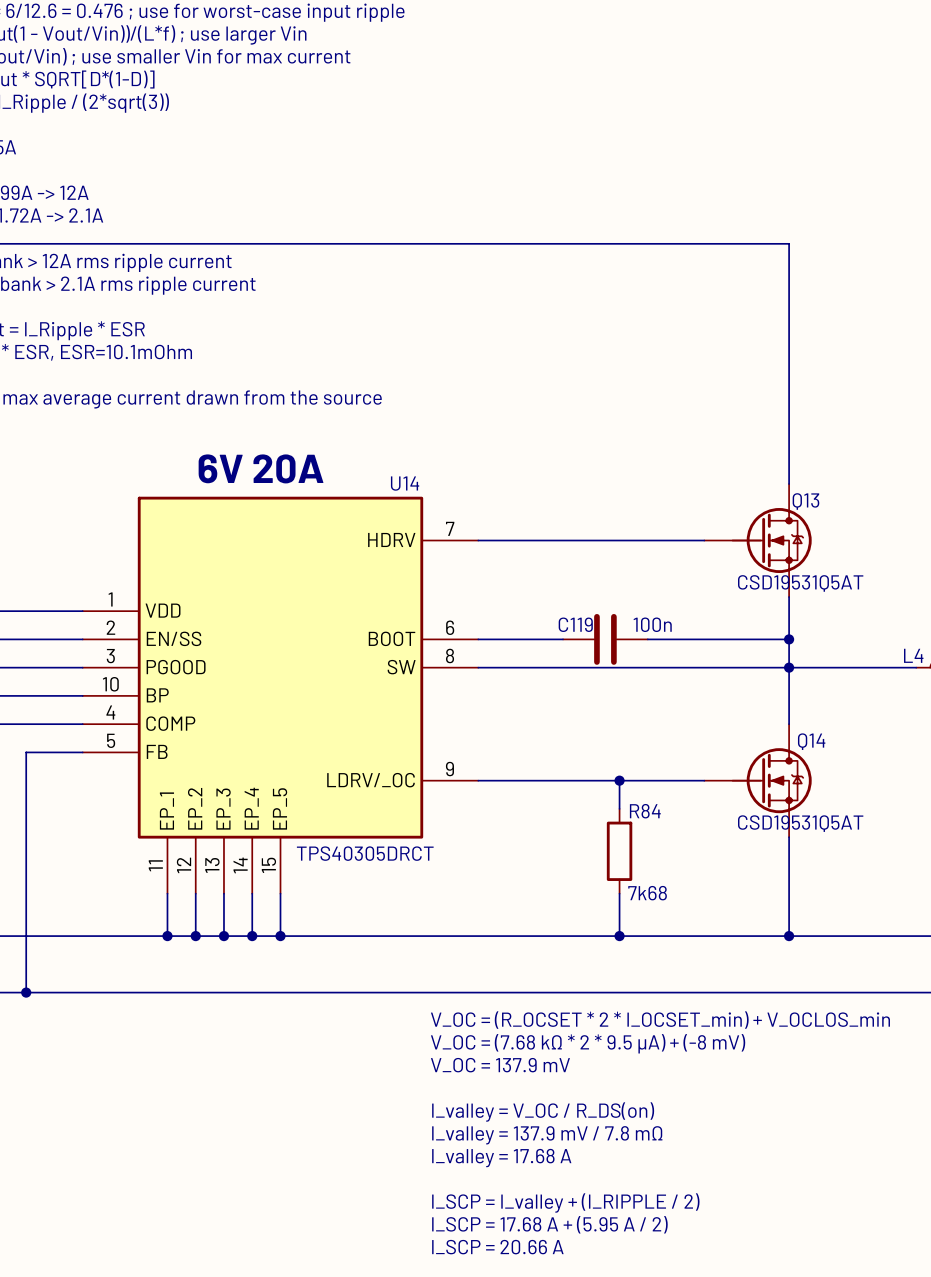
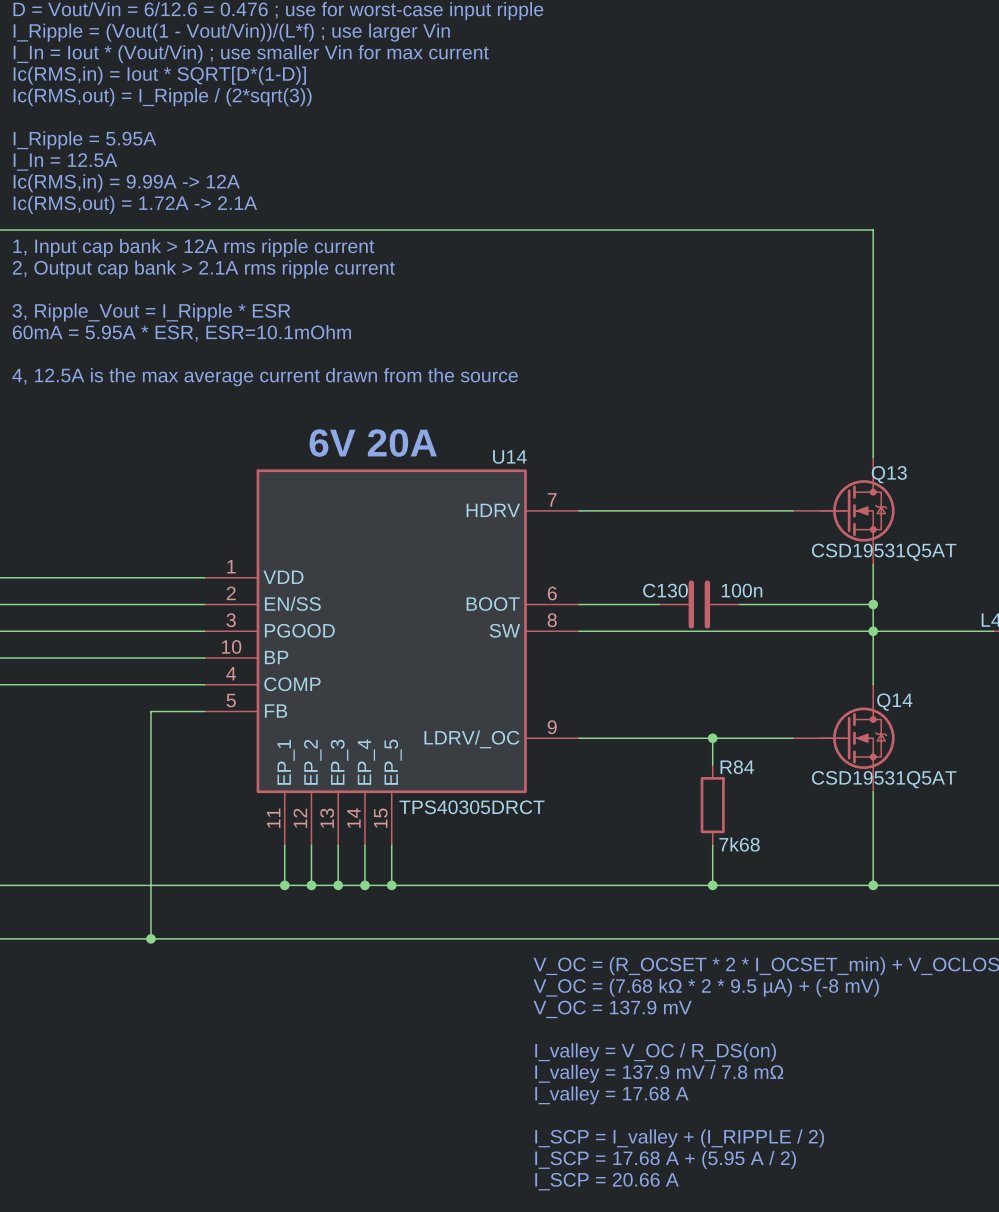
C119 name: C119 (575, 624) -> C130 (665, 590)

